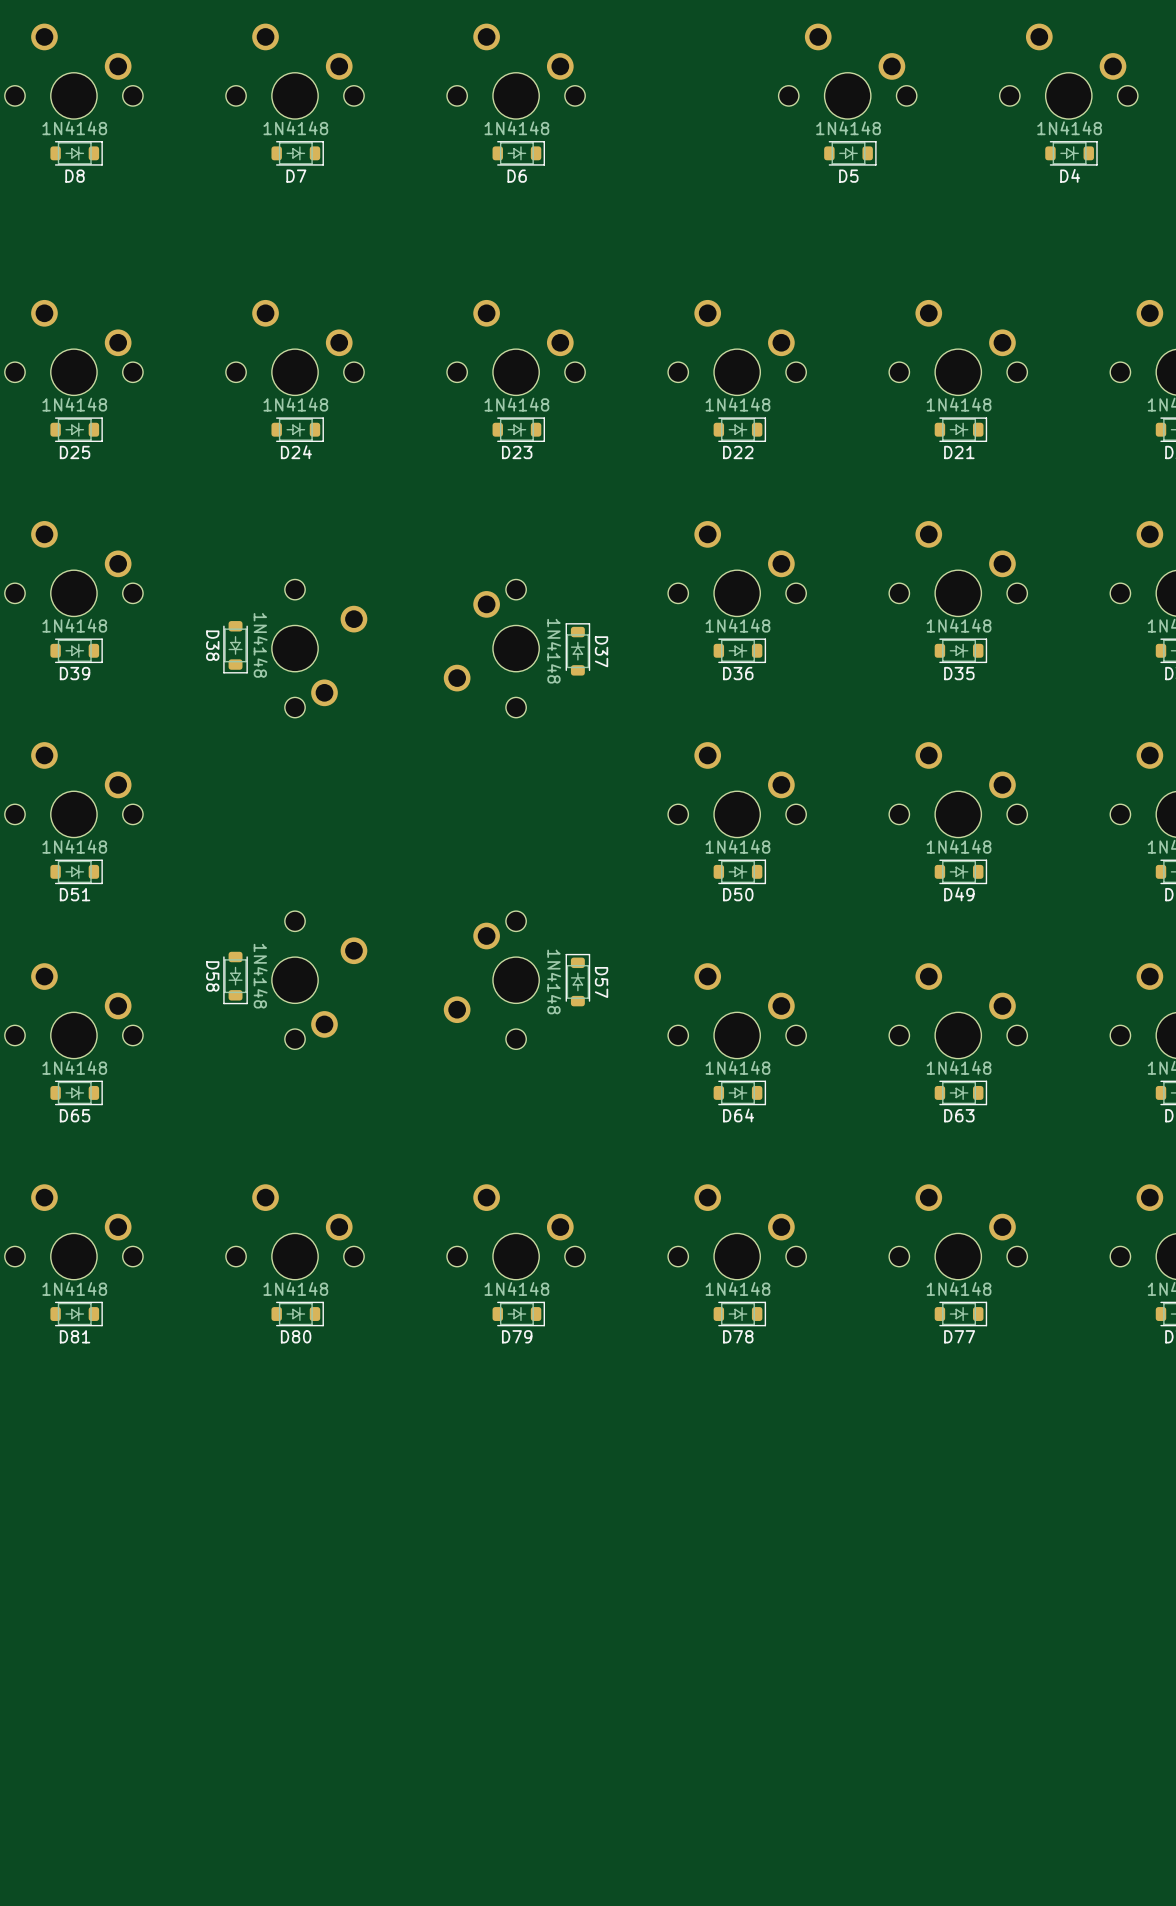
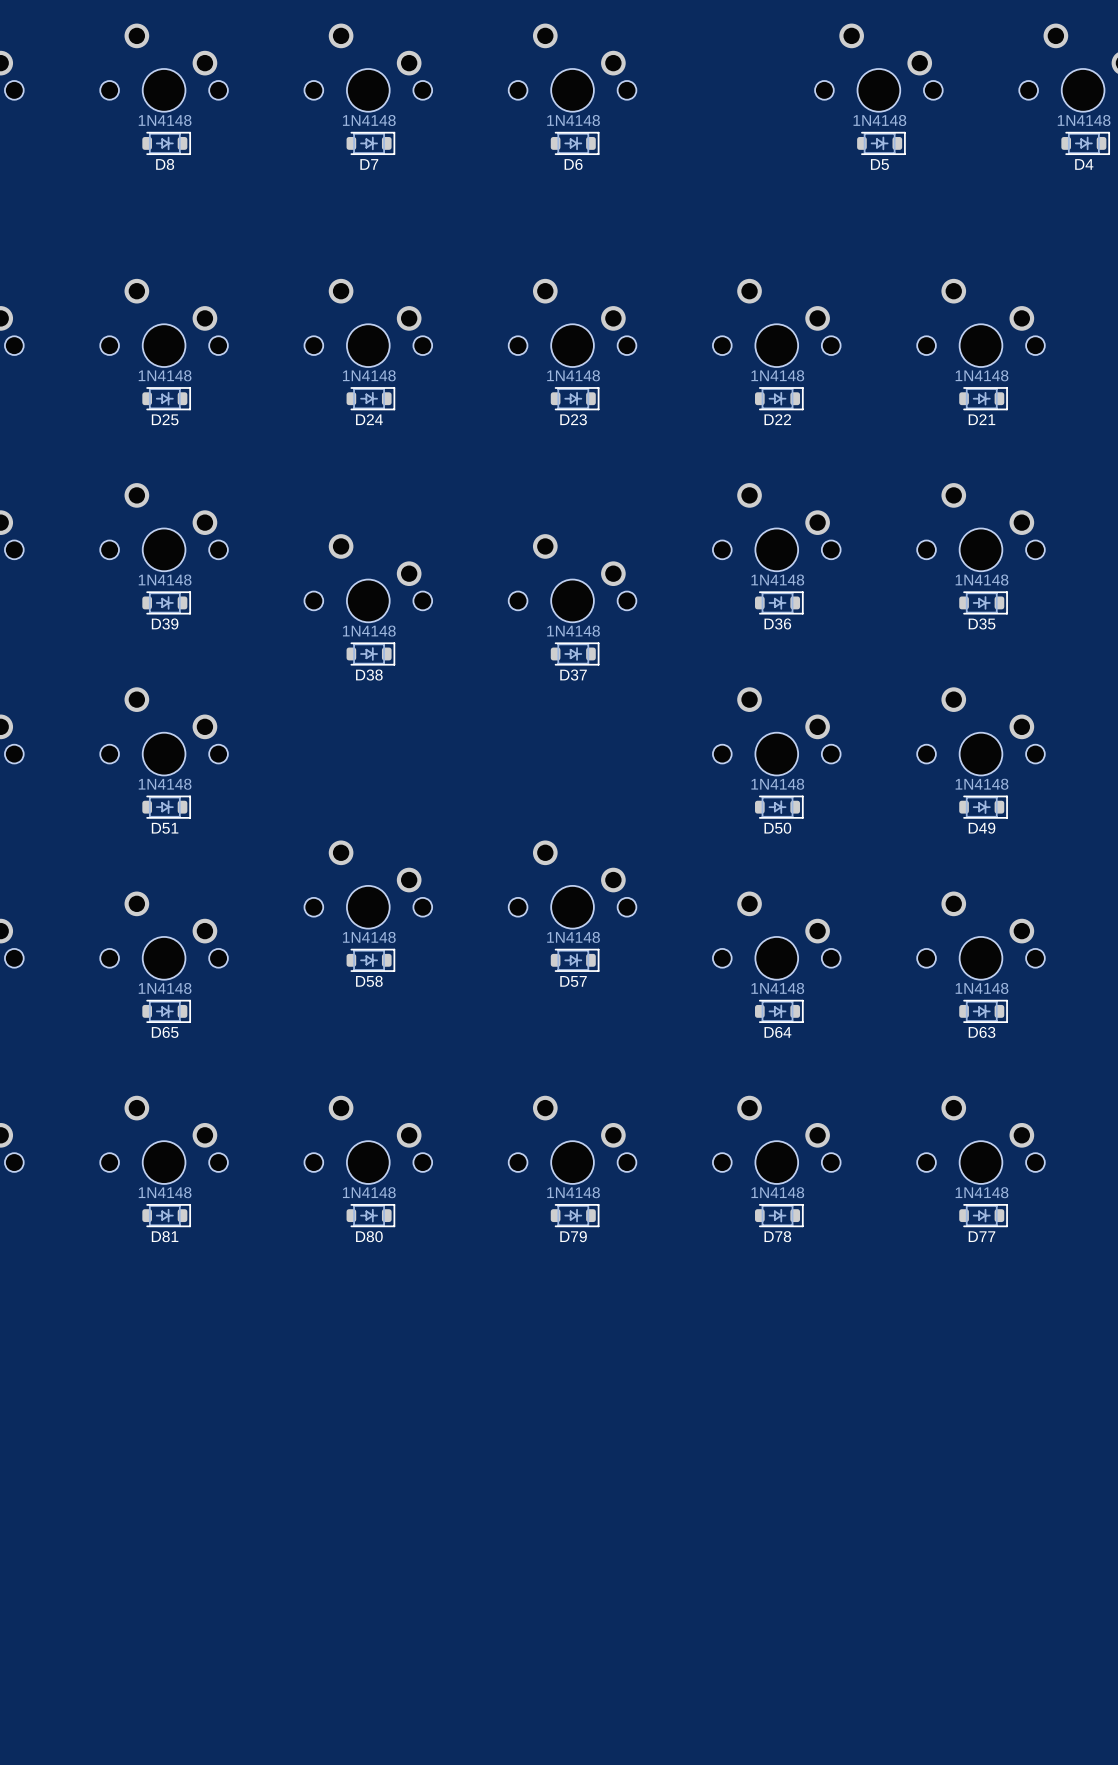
D38 rotation: 0° (235, 647) -> 90° counterclockwise (370, 653)
D38 position: (235, 647) -> (370, 653)
part rotation: 0° (319, 648) -> 90° counterclockwise (368, 578)
part rotation: 0° (491, 648) -> 90° clockwise (572, 578)
D37 rotation: 0° (577, 649) -> 90° clockwise (575, 653)
D37 position: (577, 649) -> (575, 653)
D58 rotation: 0° (235, 978) -> 90° counterclockwise (370, 960)
D58 position: (235, 978) -> (370, 960)
part rotation: 0° (319, 980) -> 90° counterclockwise (368, 884)
part rotation: 0° (491, 980) -> 90° clockwise (572, 884)
D57 rotation: 0° (577, 980) -> 90° clockwise (575, 960)
D57 position: (577, 980) -> (575, 960)

